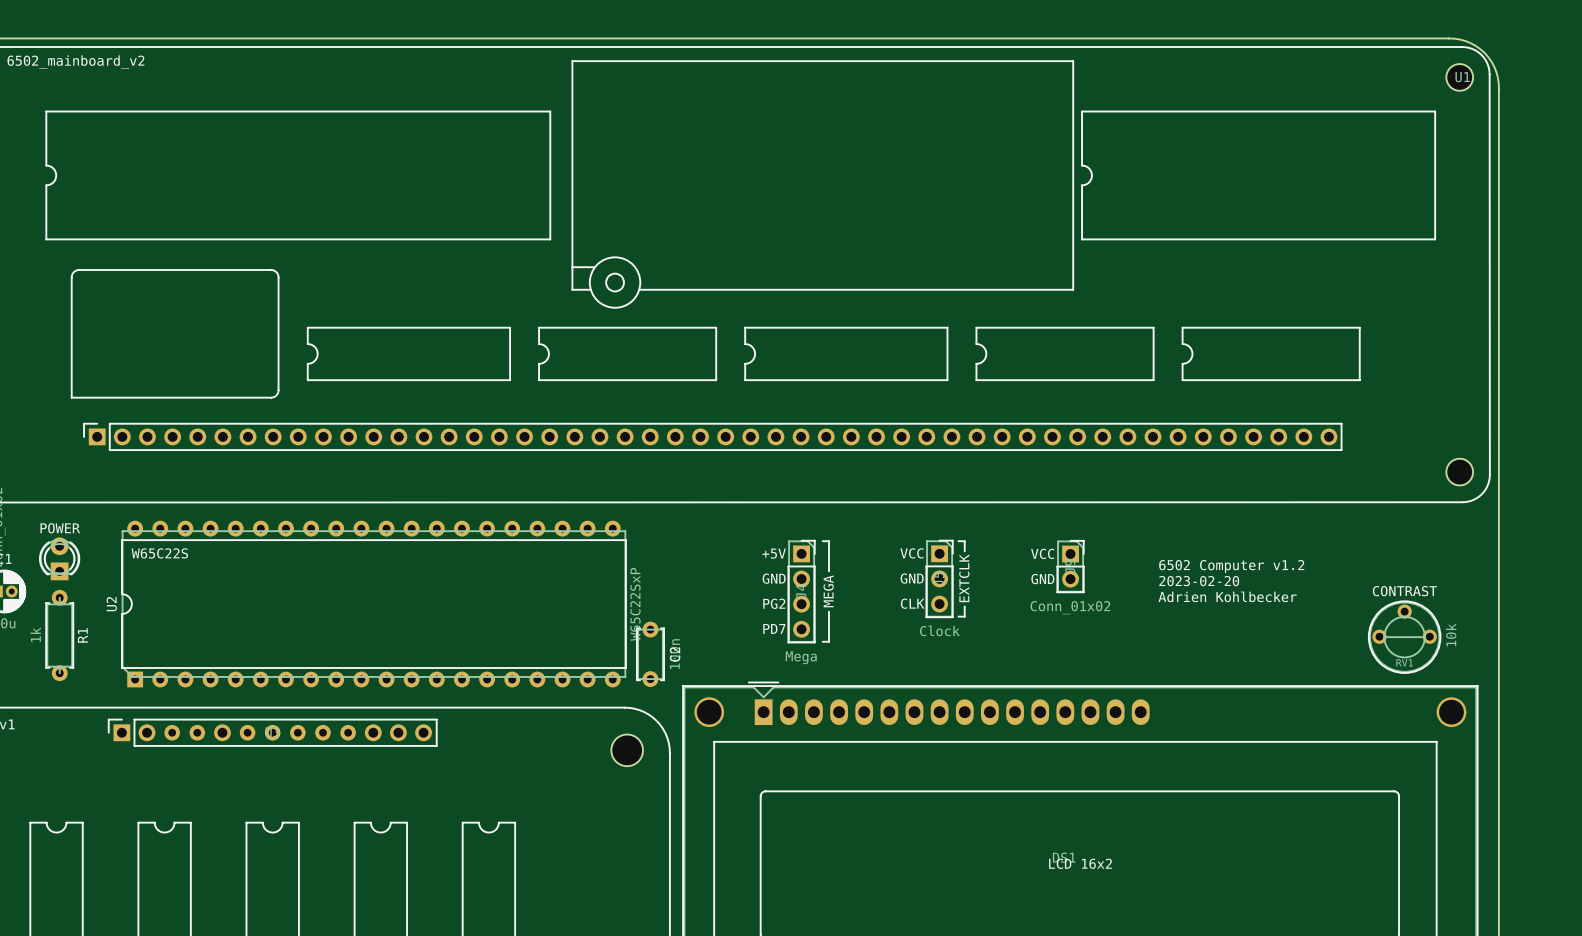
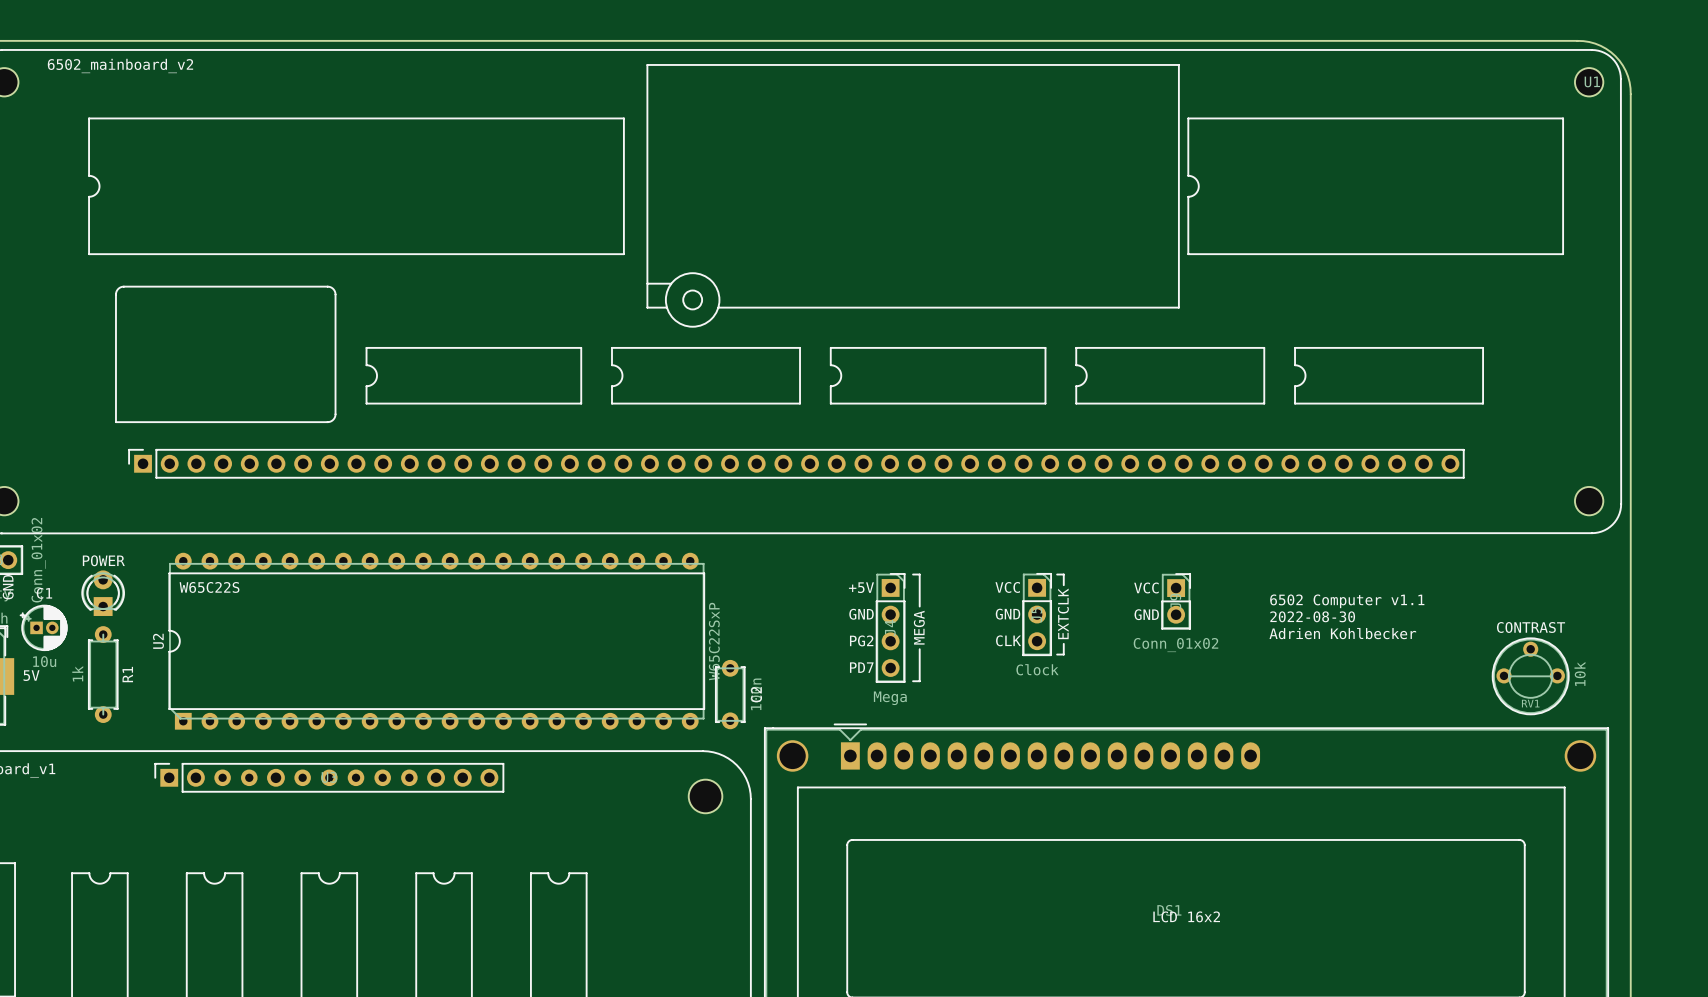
text: 6502 Computer v1.2 (1231, 566) -> 6502 Computer v1.1 (1347, 601)
text: 2023-02-20 (1199, 581) -> 2022-08-30 (1312, 616)

